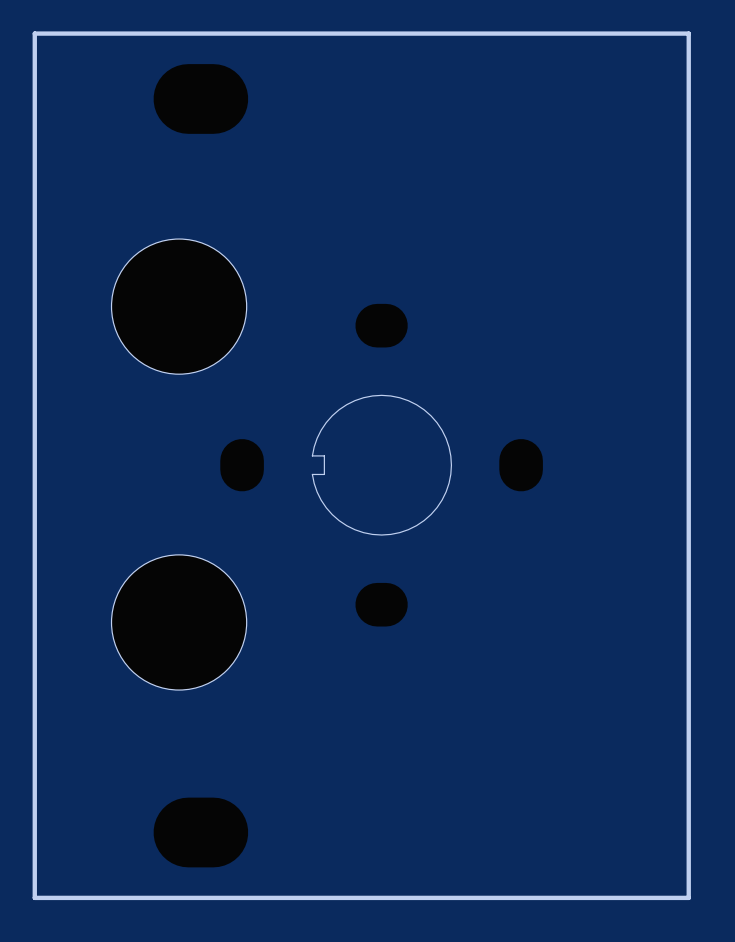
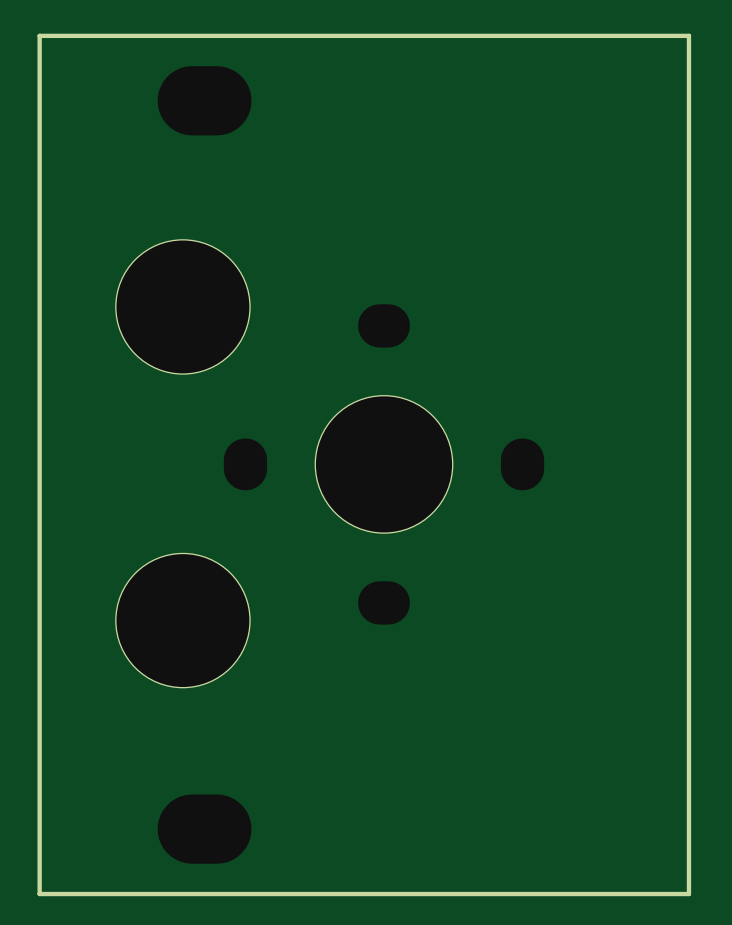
part footprint: [220, 303, 543, 627] -> [223, 304, 545, 625]

